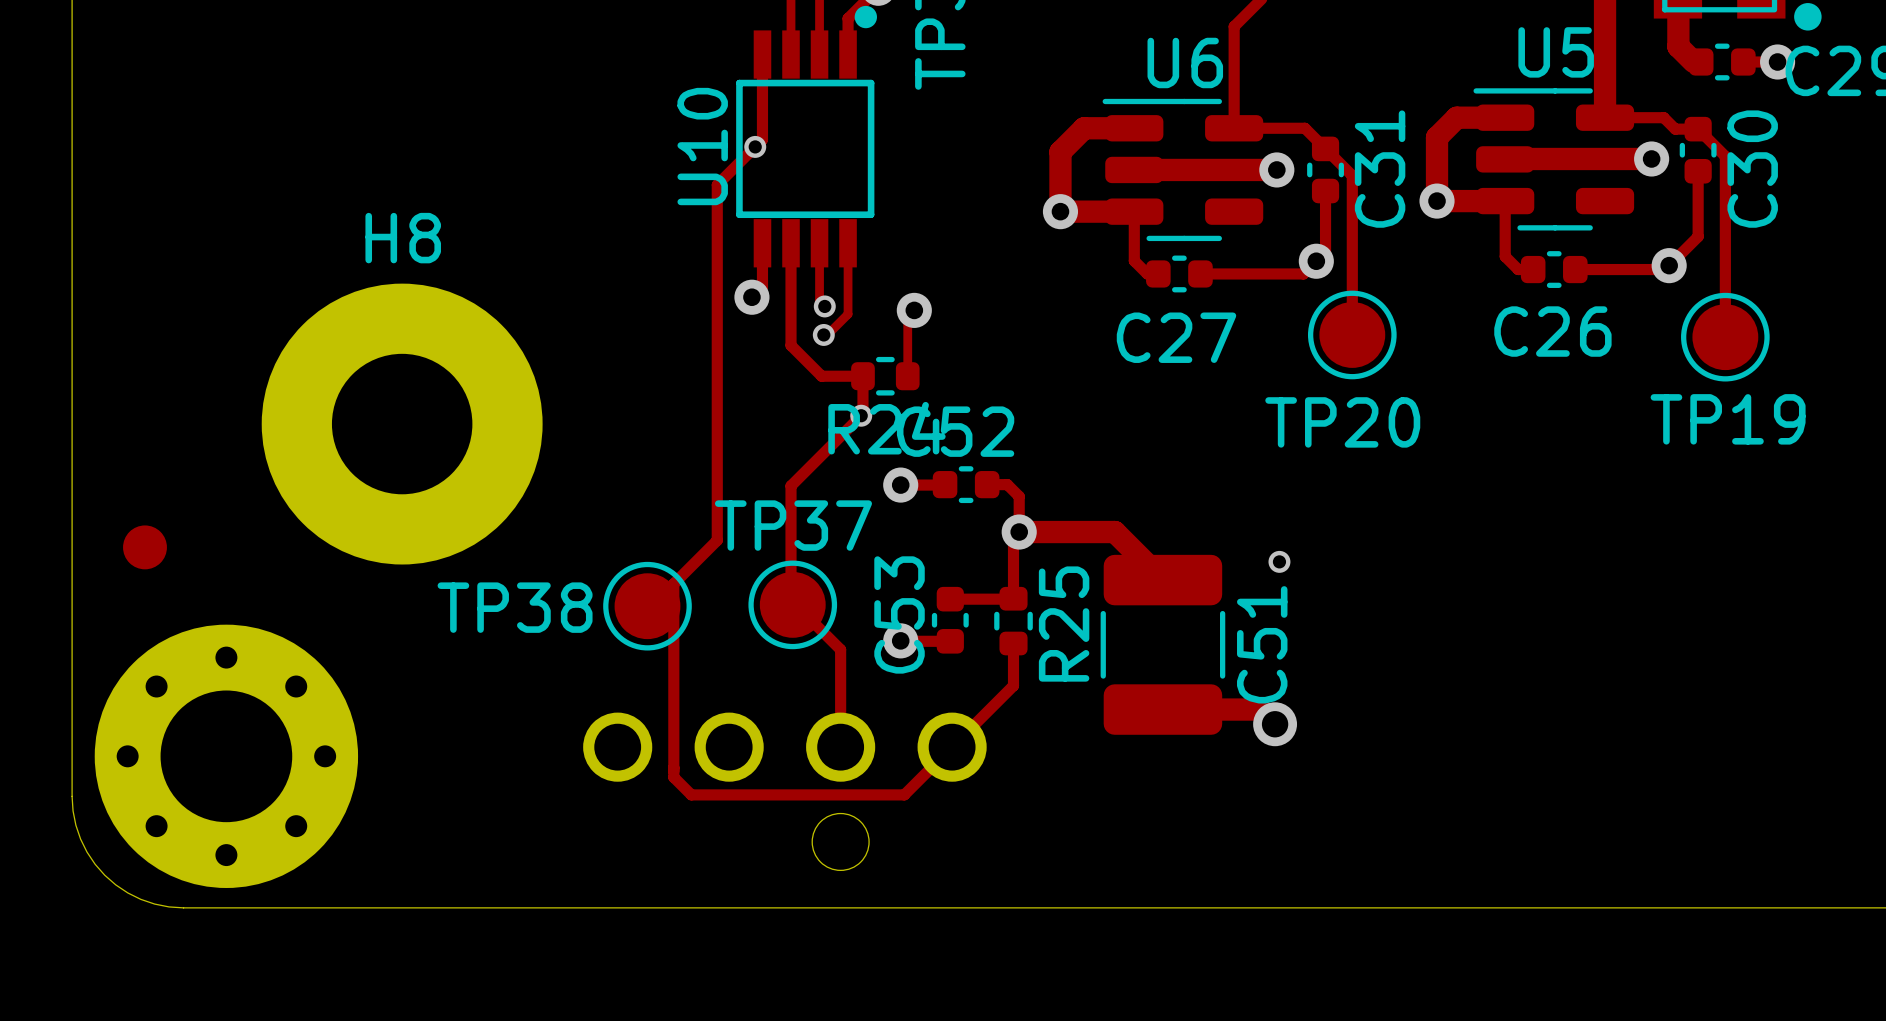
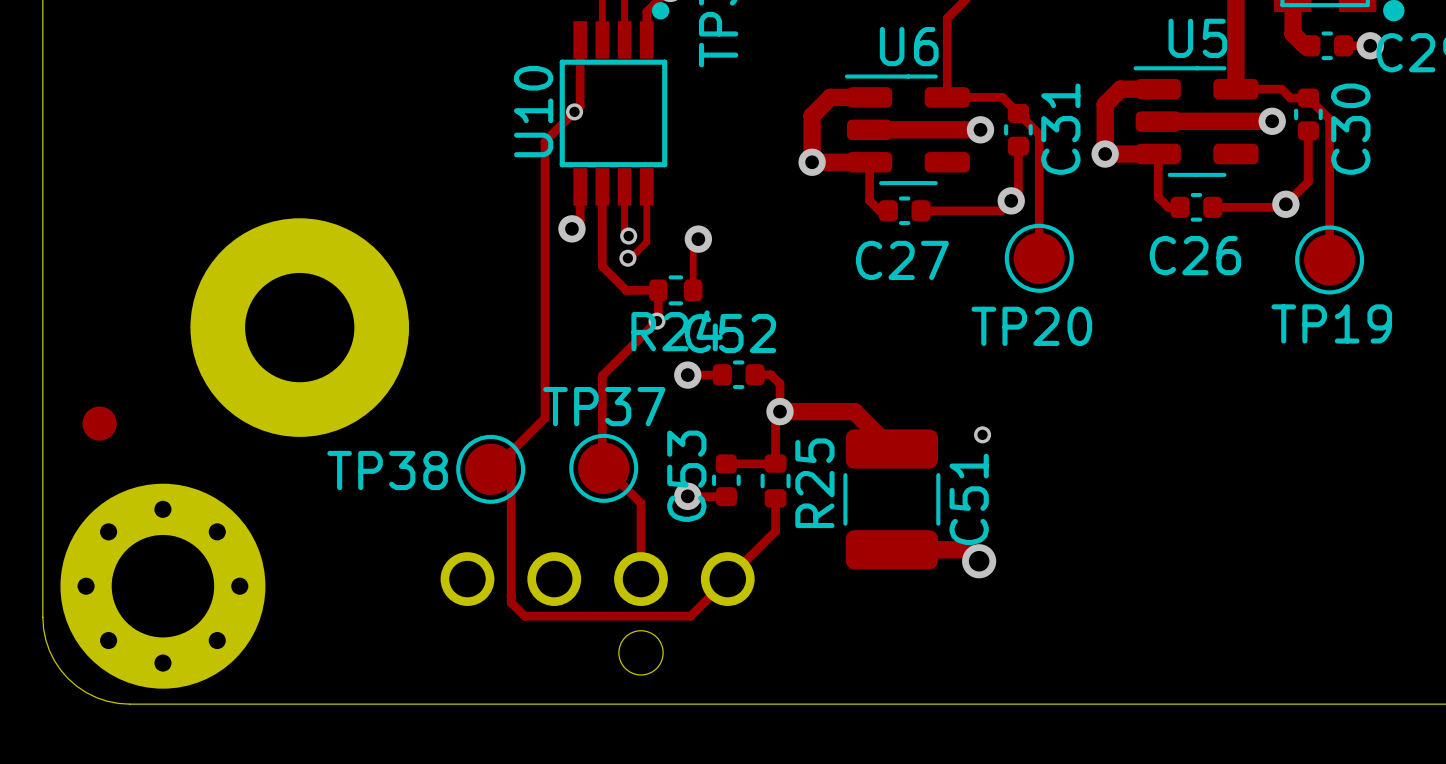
H8 name: H8 (403, 238) -> none

